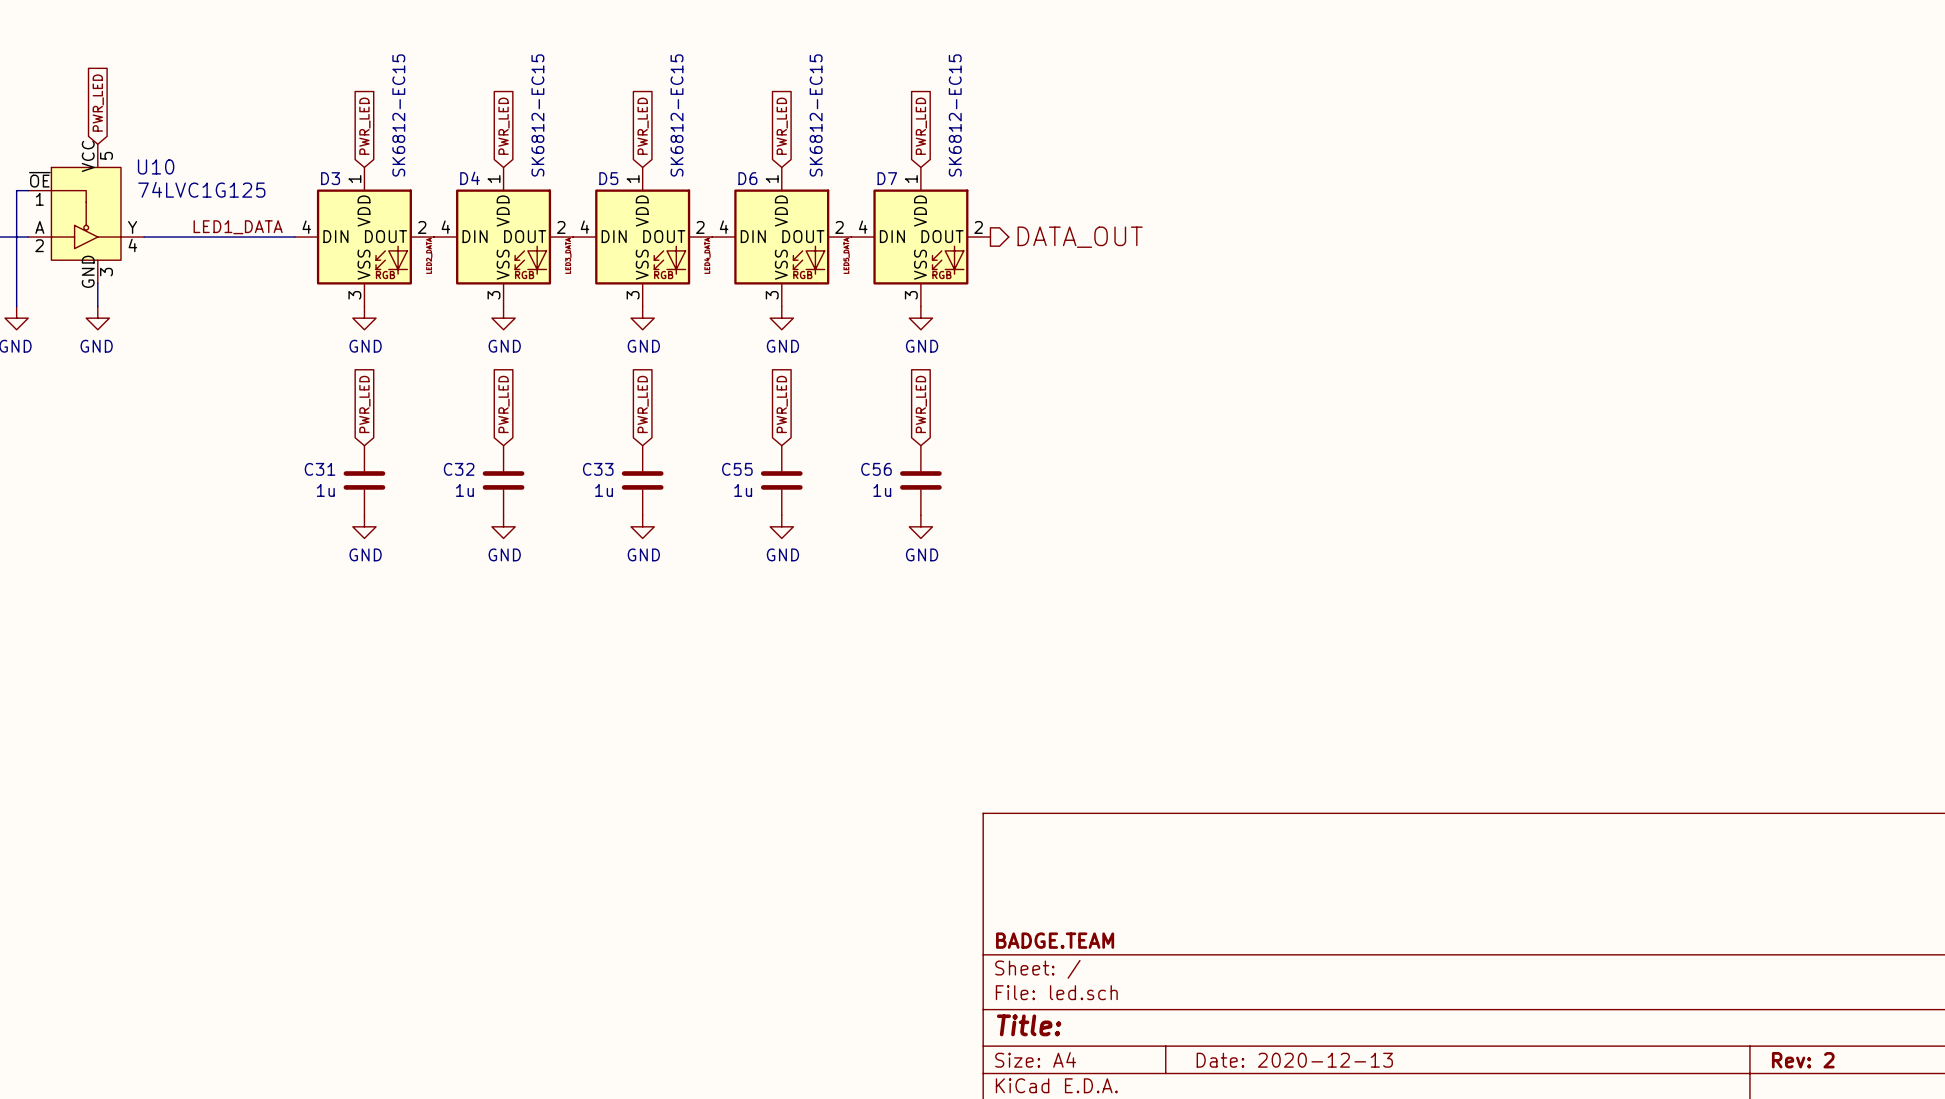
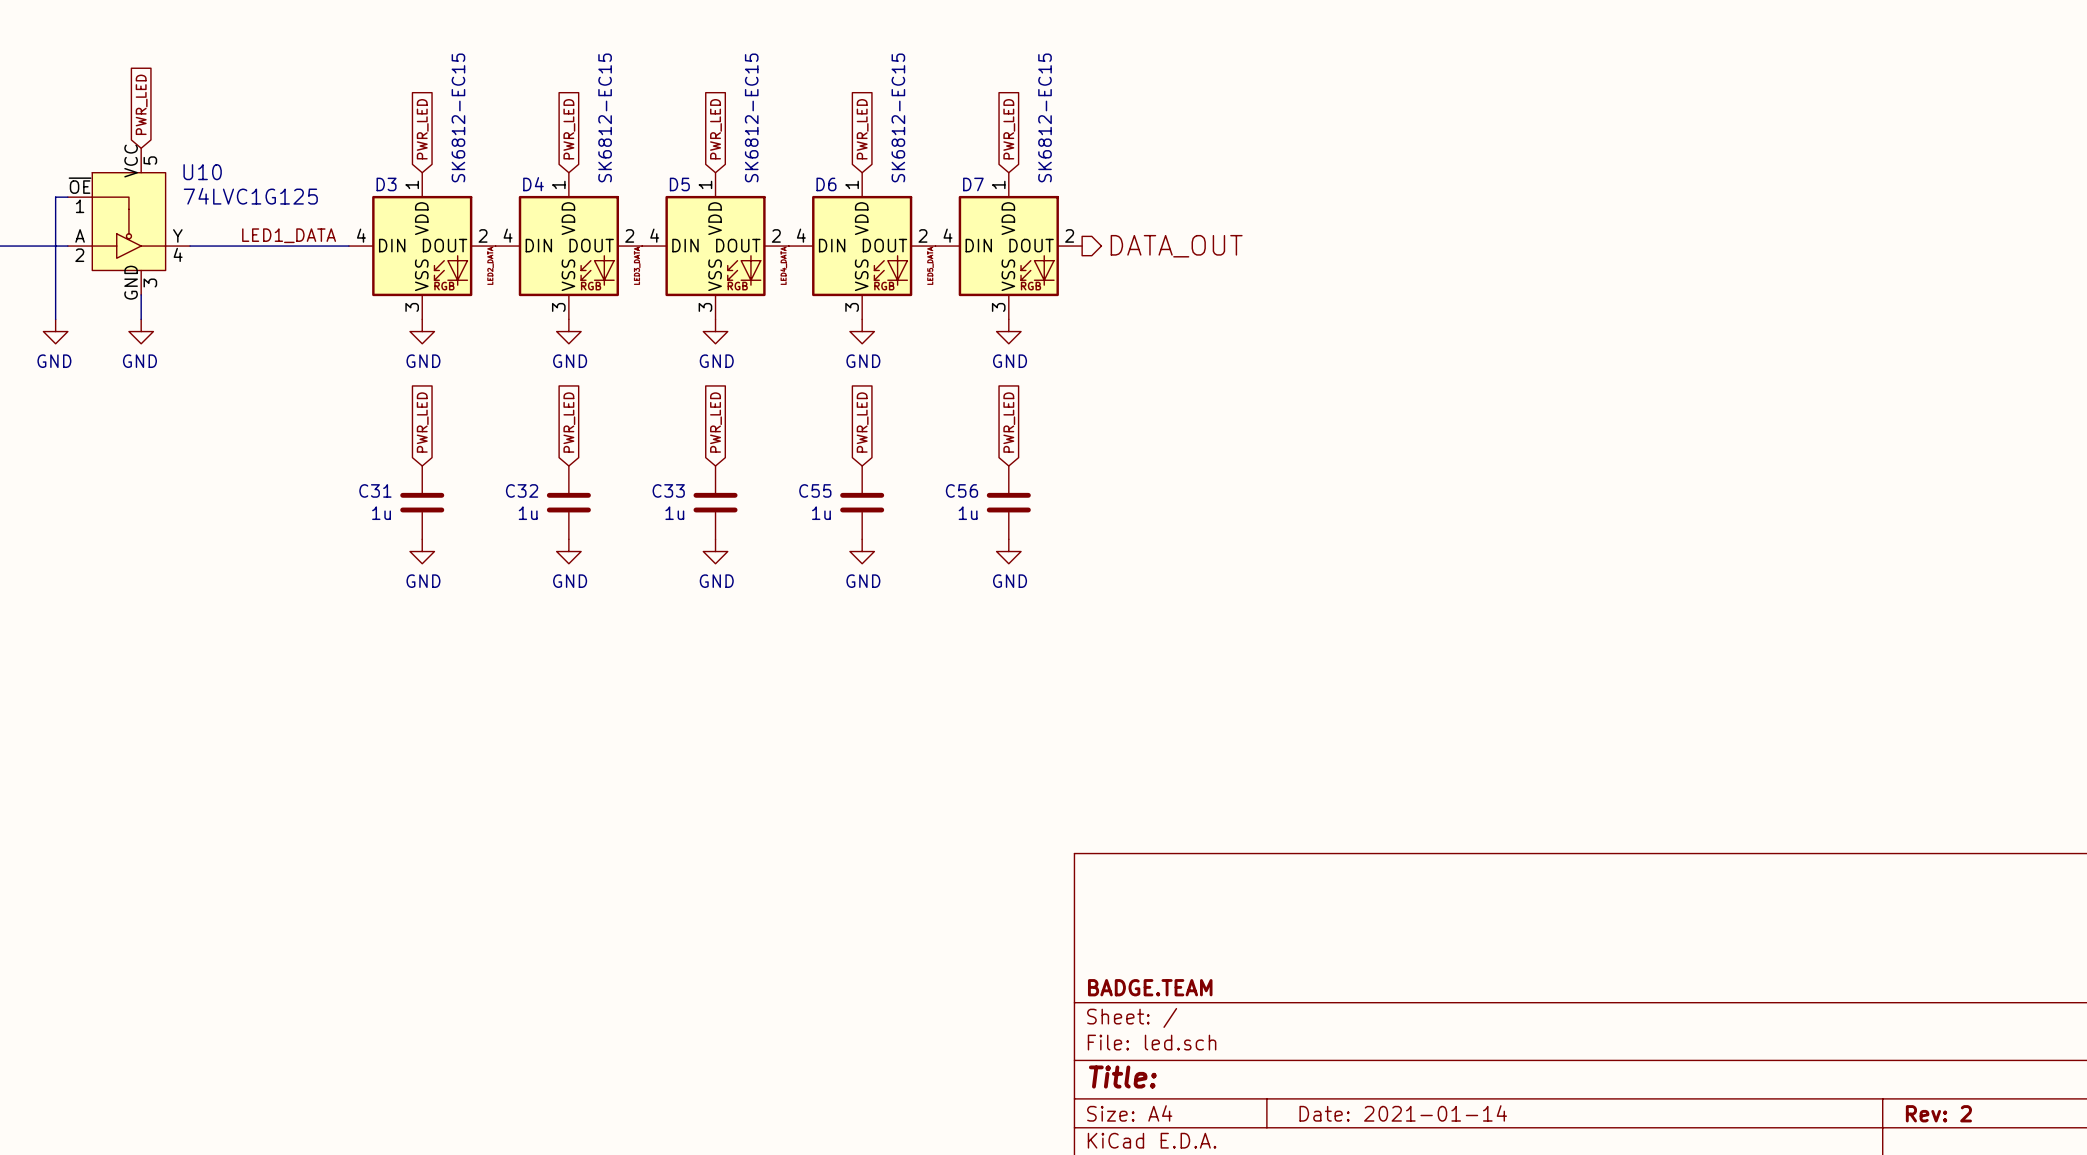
title block: Date: 2020-12-13 (1294, 1060) -> Date: 2021-01-14 (1403, 1113)

